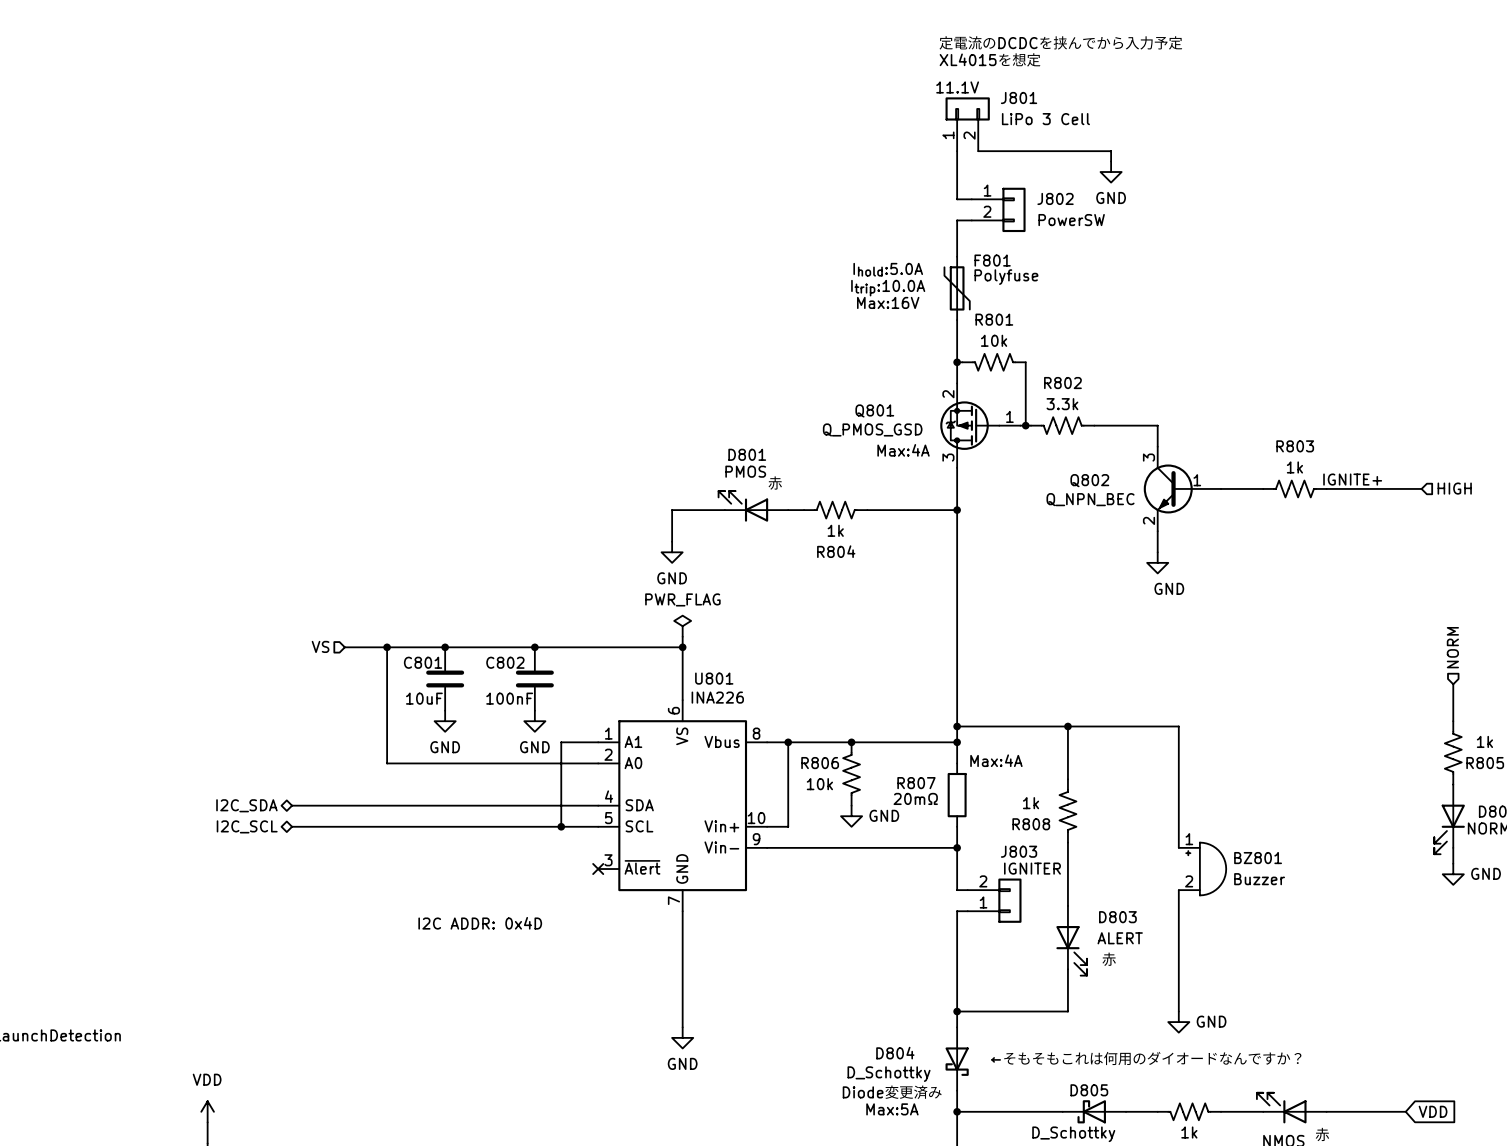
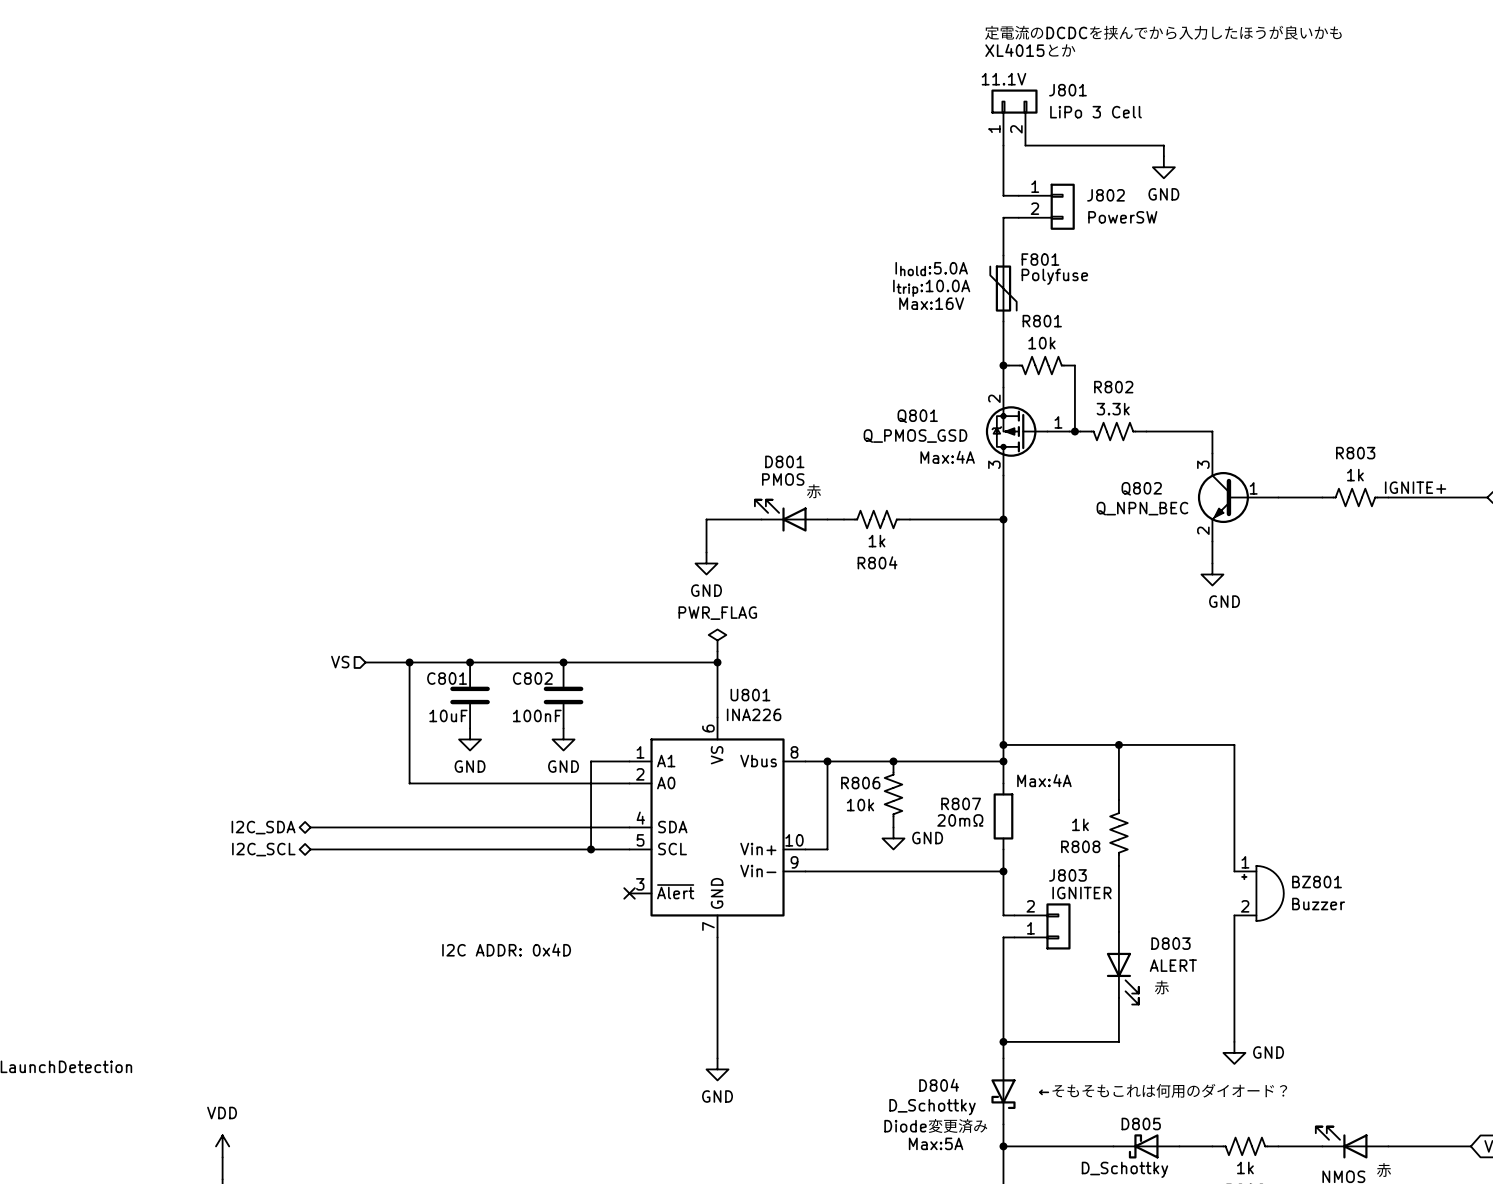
text: 定電流のDCDCを挟んでから入力予定 (1060, 42) -> 定電流のDCDCを挟んでから入力したほうが良いかも (1163, 32)
text: XL4015を想定 (990, 59) -> XL4015とか (1030, 50)
text: ←そもそもこれは何用のダイオードなんですか？ (1146, 1058) -> ←そもそもこれは何用のダイオード？ (1163, 1090)

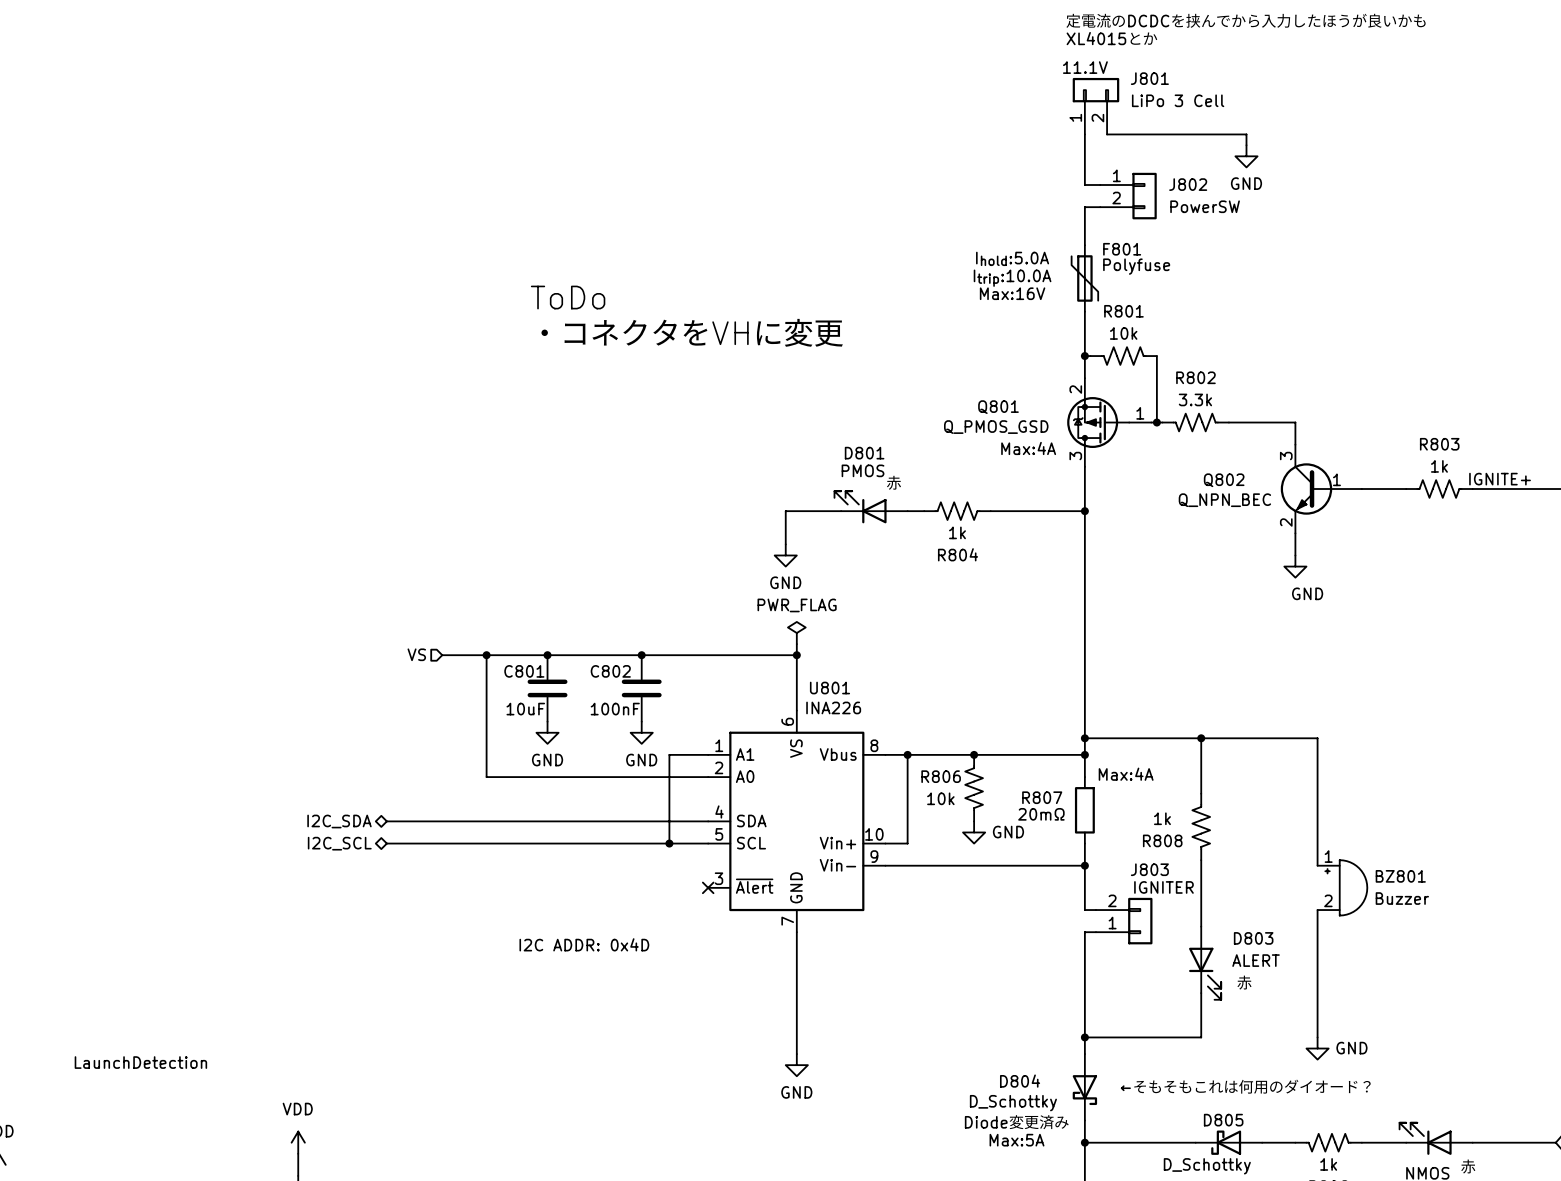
text: none -> ToDo (568, 297)
text: none -> ・コネクタをVHに変更 (692, 332)

